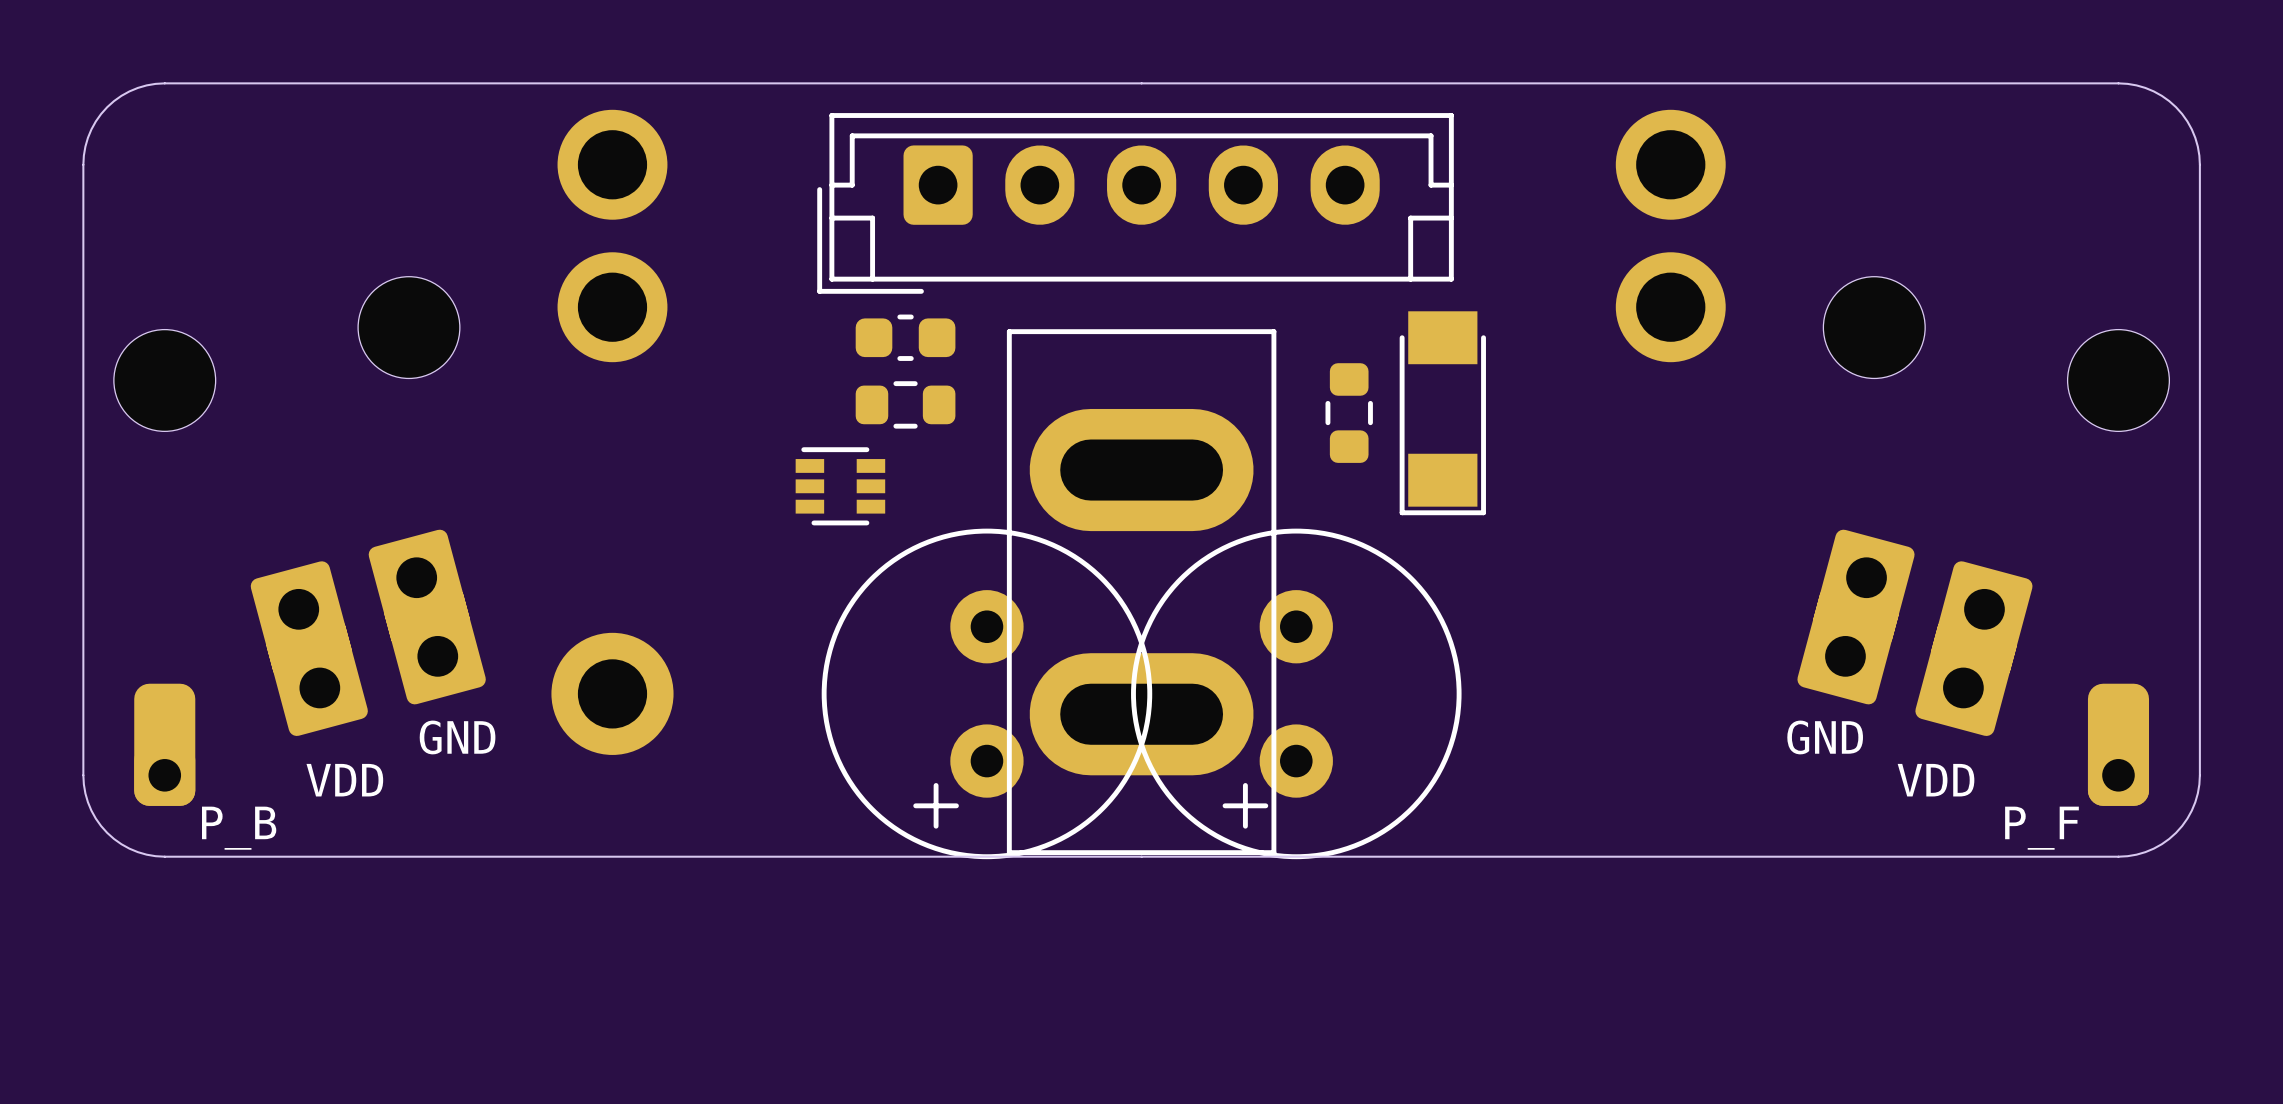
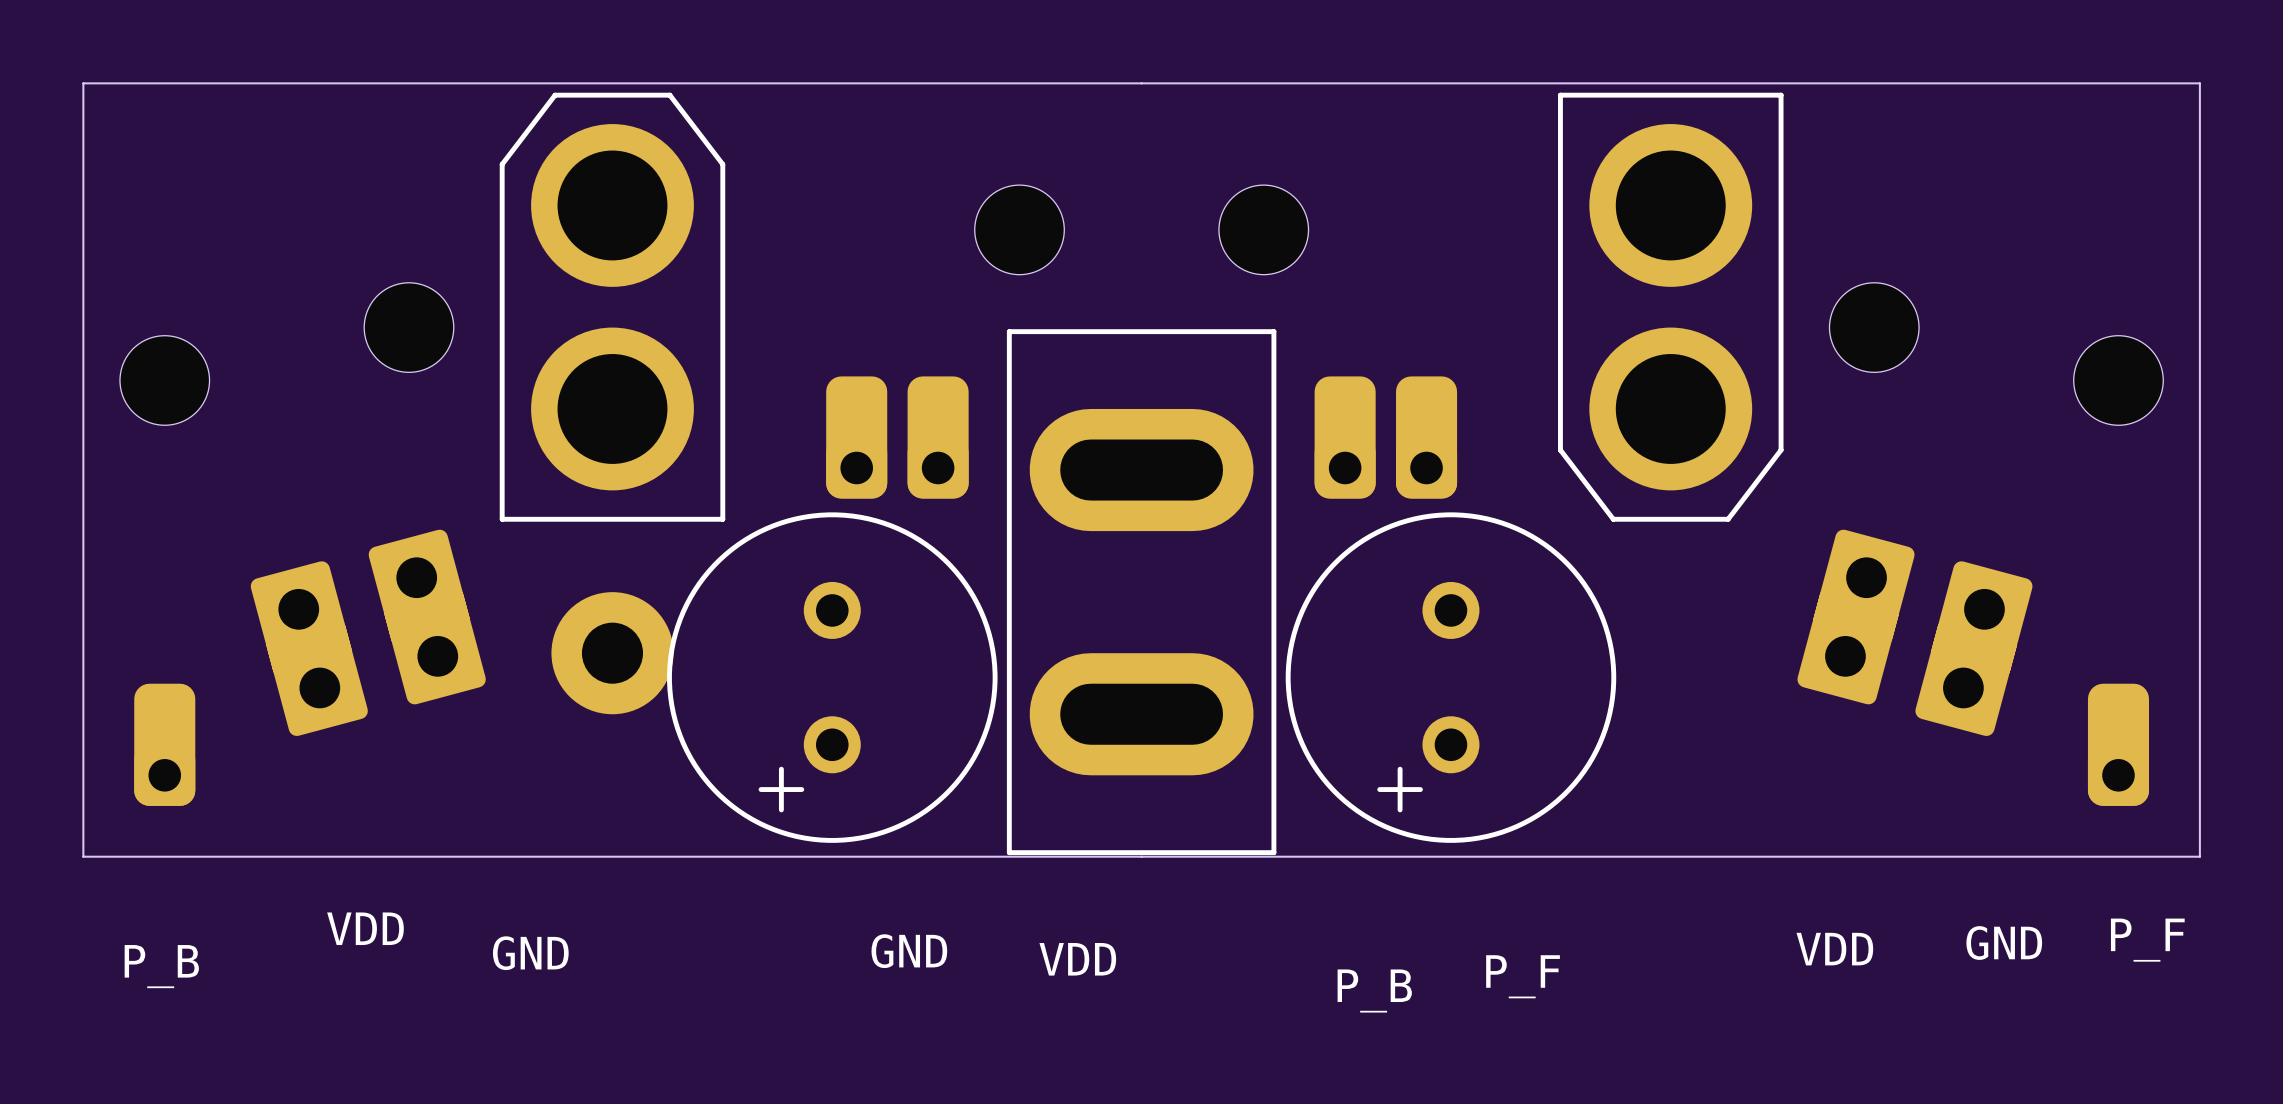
board edge: (164, 83) (146, 85) (129, 91) (107, 107) (95, 121) (87, 137) (83, 164) -> (164, 83) (83, 83) (83, 164)
board edge: (2118, 83) (2145, 87) (2161, 95) (2176, 107) (2187, 121) (2195, 137) (2199, 164) -> (2118, 83) (2199, 83) (2199, 164)
part: (1135, 203) -> none
part: none -> (1019, 229)
part: none -> (1263, 229)
part: (612, 235) -> none
part: (1670, 235) -> none
part footprint: [358, 276, 460, 379] -> [364, 282, 454, 373]
part footprint: [1823, 276, 1926, 379] -> [1829, 282, 1920, 373]
part: none -> (612, 307)
part: none -> (1670, 307)
part footprint: [1399, 311, 1486, 516] -> [1396, 376, 1458, 499]
part footprint: [113, 329, 216, 432] -> [119, 335, 210, 426]
part footprint: [2067, 329, 2170, 432] -> [2073, 335, 2164, 426]
part: (905, 337) -> none
part footprint: [1325, 363, 1373, 463] -> [1314, 376, 1376, 499]
part: (905, 404) -> none
part: none -> (856, 437)
part: none -> (938, 437)
part: (840, 486) -> none
part footprint: [551, 632, 674, 755] -> [551, 592, 674, 715]
part: none -> (832, 677)
part: none -> (1450, 677)
part: (986, 693) -> none
part: (1296, 693) -> none
text position: GND (457, 737) -> GND (530, 953)
text position: GND (1825, 737) -> GND (2004, 943)
board edge: (83, 775) (85, 793) (91, 810) (107, 832) (121, 844) (137, 852) (164, 856) -> (83, 775) (83, 856) (164, 856)
board edge: (2199, 775) (2197, 793) (2191, 810) (2176, 832) (2161, 844) (2145, 852) (2118, 856) -> (2199, 775) (2199, 856) (2118, 856)
text position: VDD (344, 780) -> VDD (365, 928)
text position: VDD (1936, 780) -> VDD (1834, 949)
text position: P_B (239, 828) -> P_B (161, 966)
text position: P_F (2041, 828) -> P_F (2147, 940)
text: none -> GND (909, 951)
text: none -> VDD (1077, 959)
text: none -> P_F (1523, 976)
text: none -> P_B (1374, 991)

